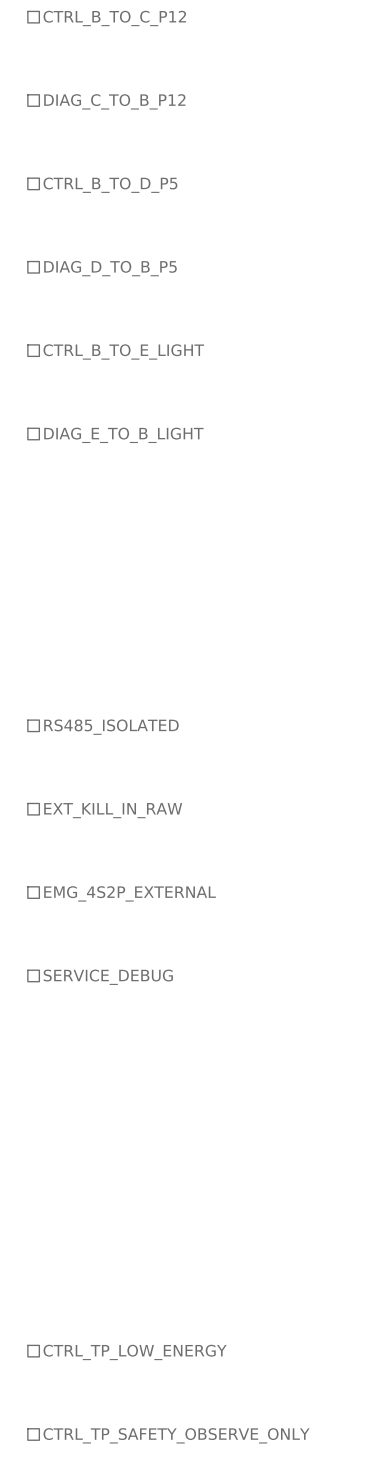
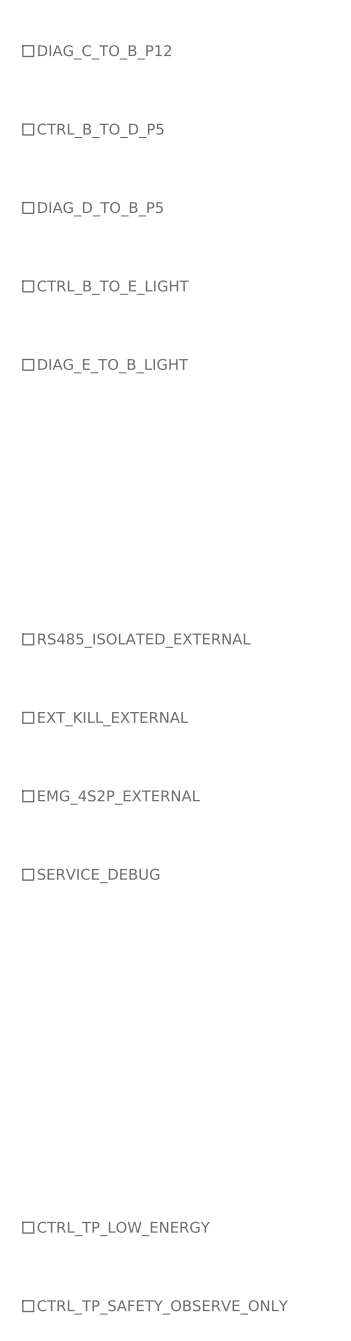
hierarchical label: RS485_ISOLATED (111, 727) -> RS485_ISOLATED_EXTERNAL (144, 640)
hierarchical label: EXT_KILL_IN_RAW (113, 810) -> EXT_KILL_EXTERNAL (113, 719)

